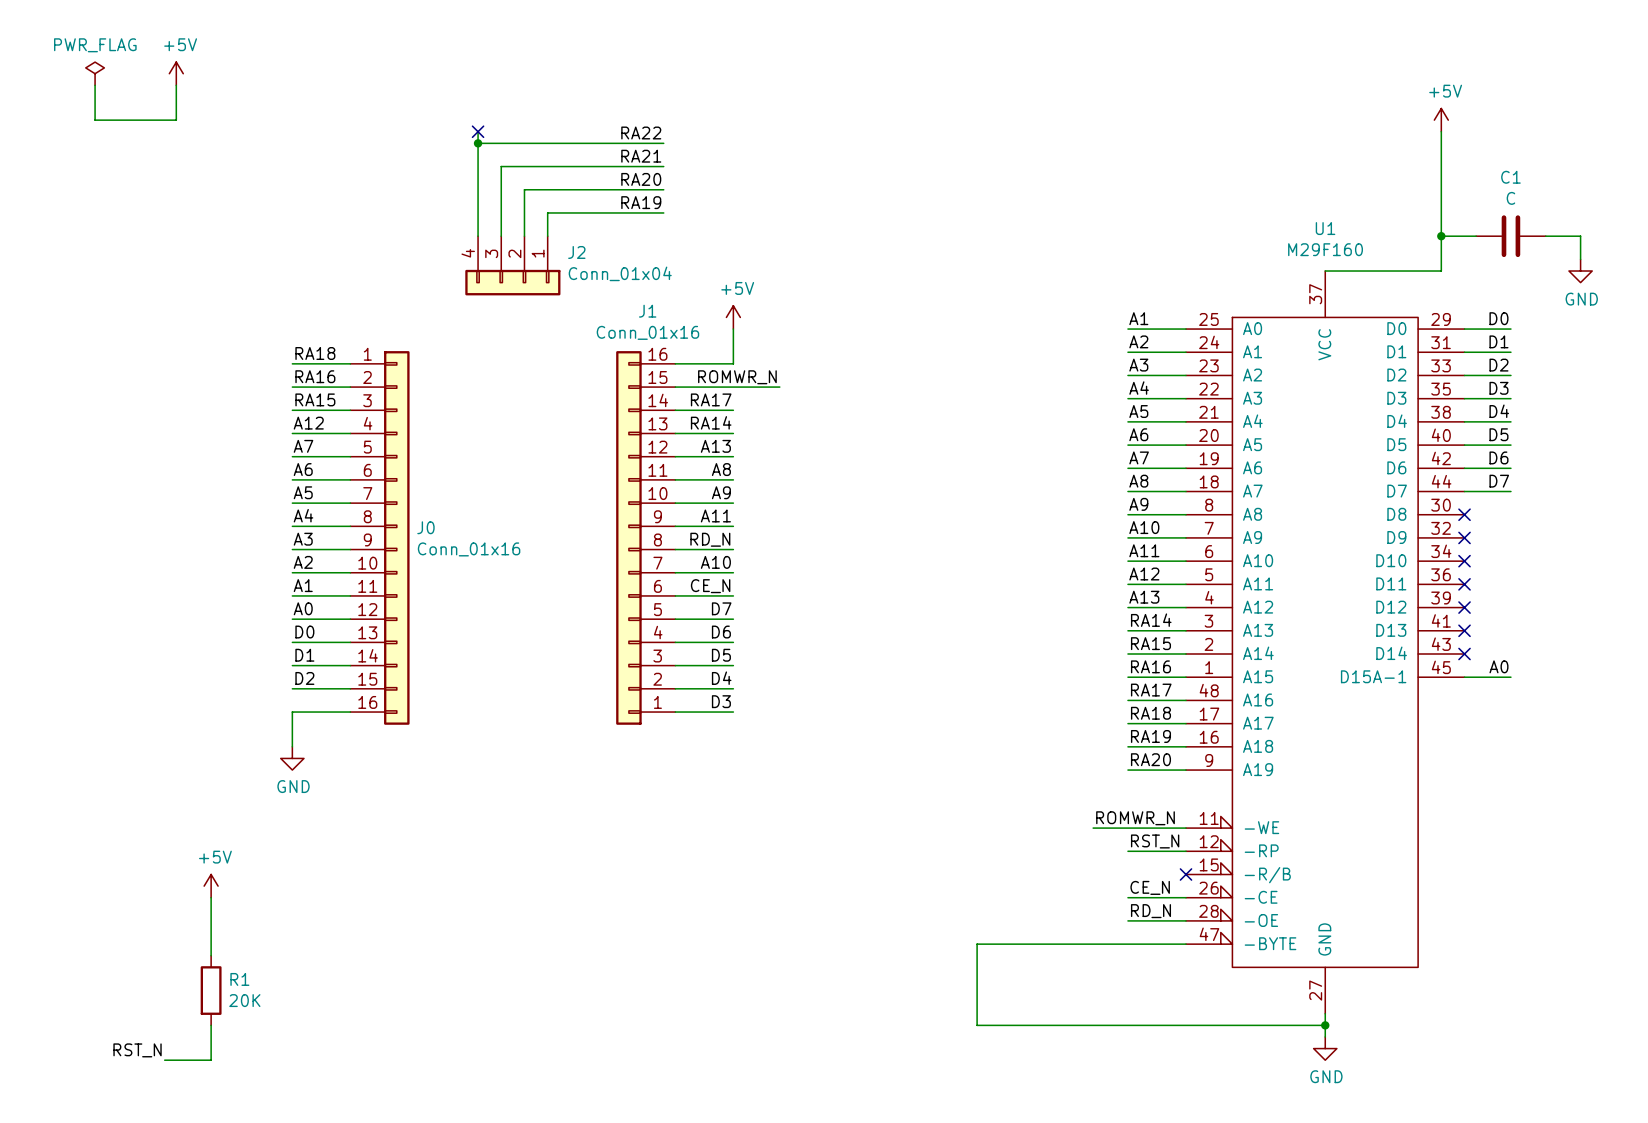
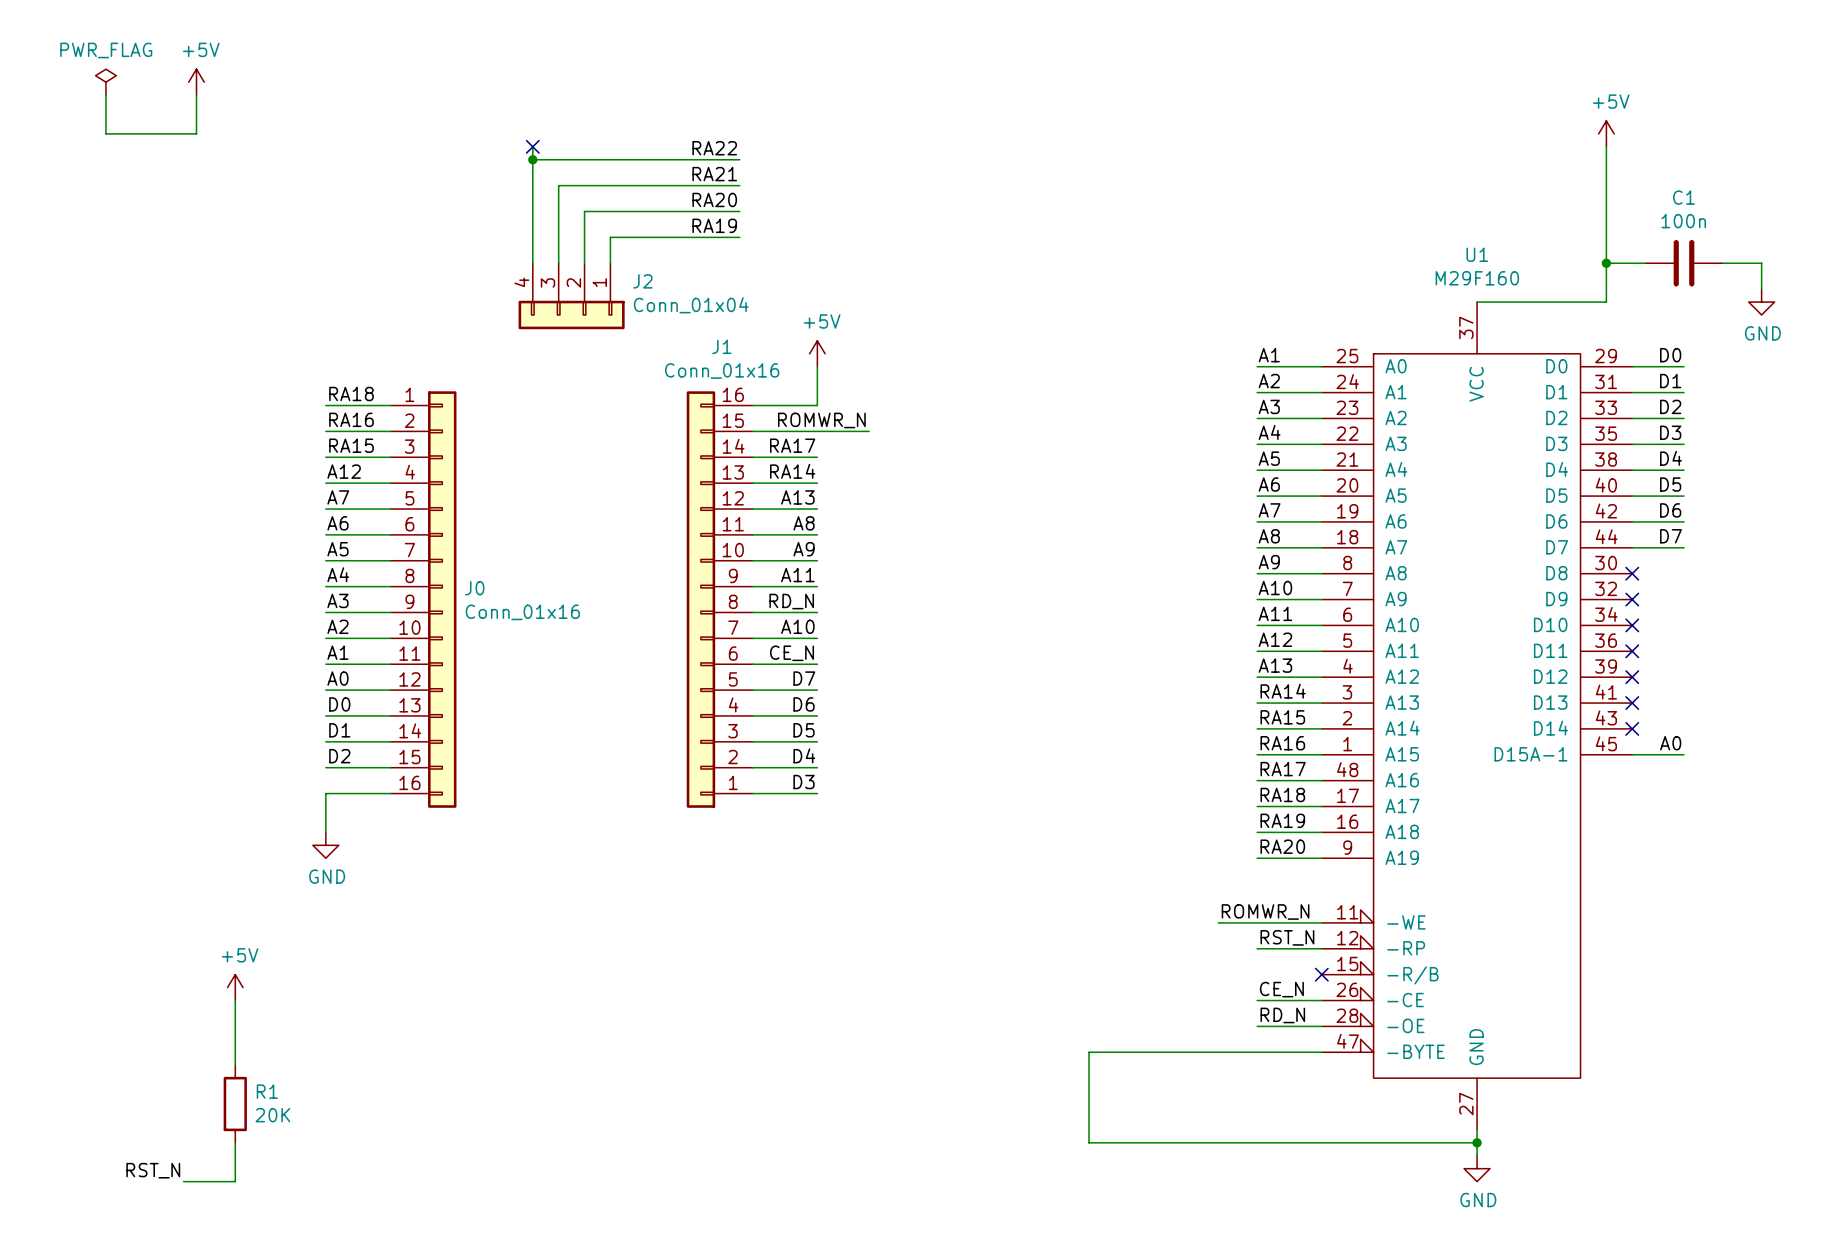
C1 value: C (1510, 198) -> 100n (1683, 221)

